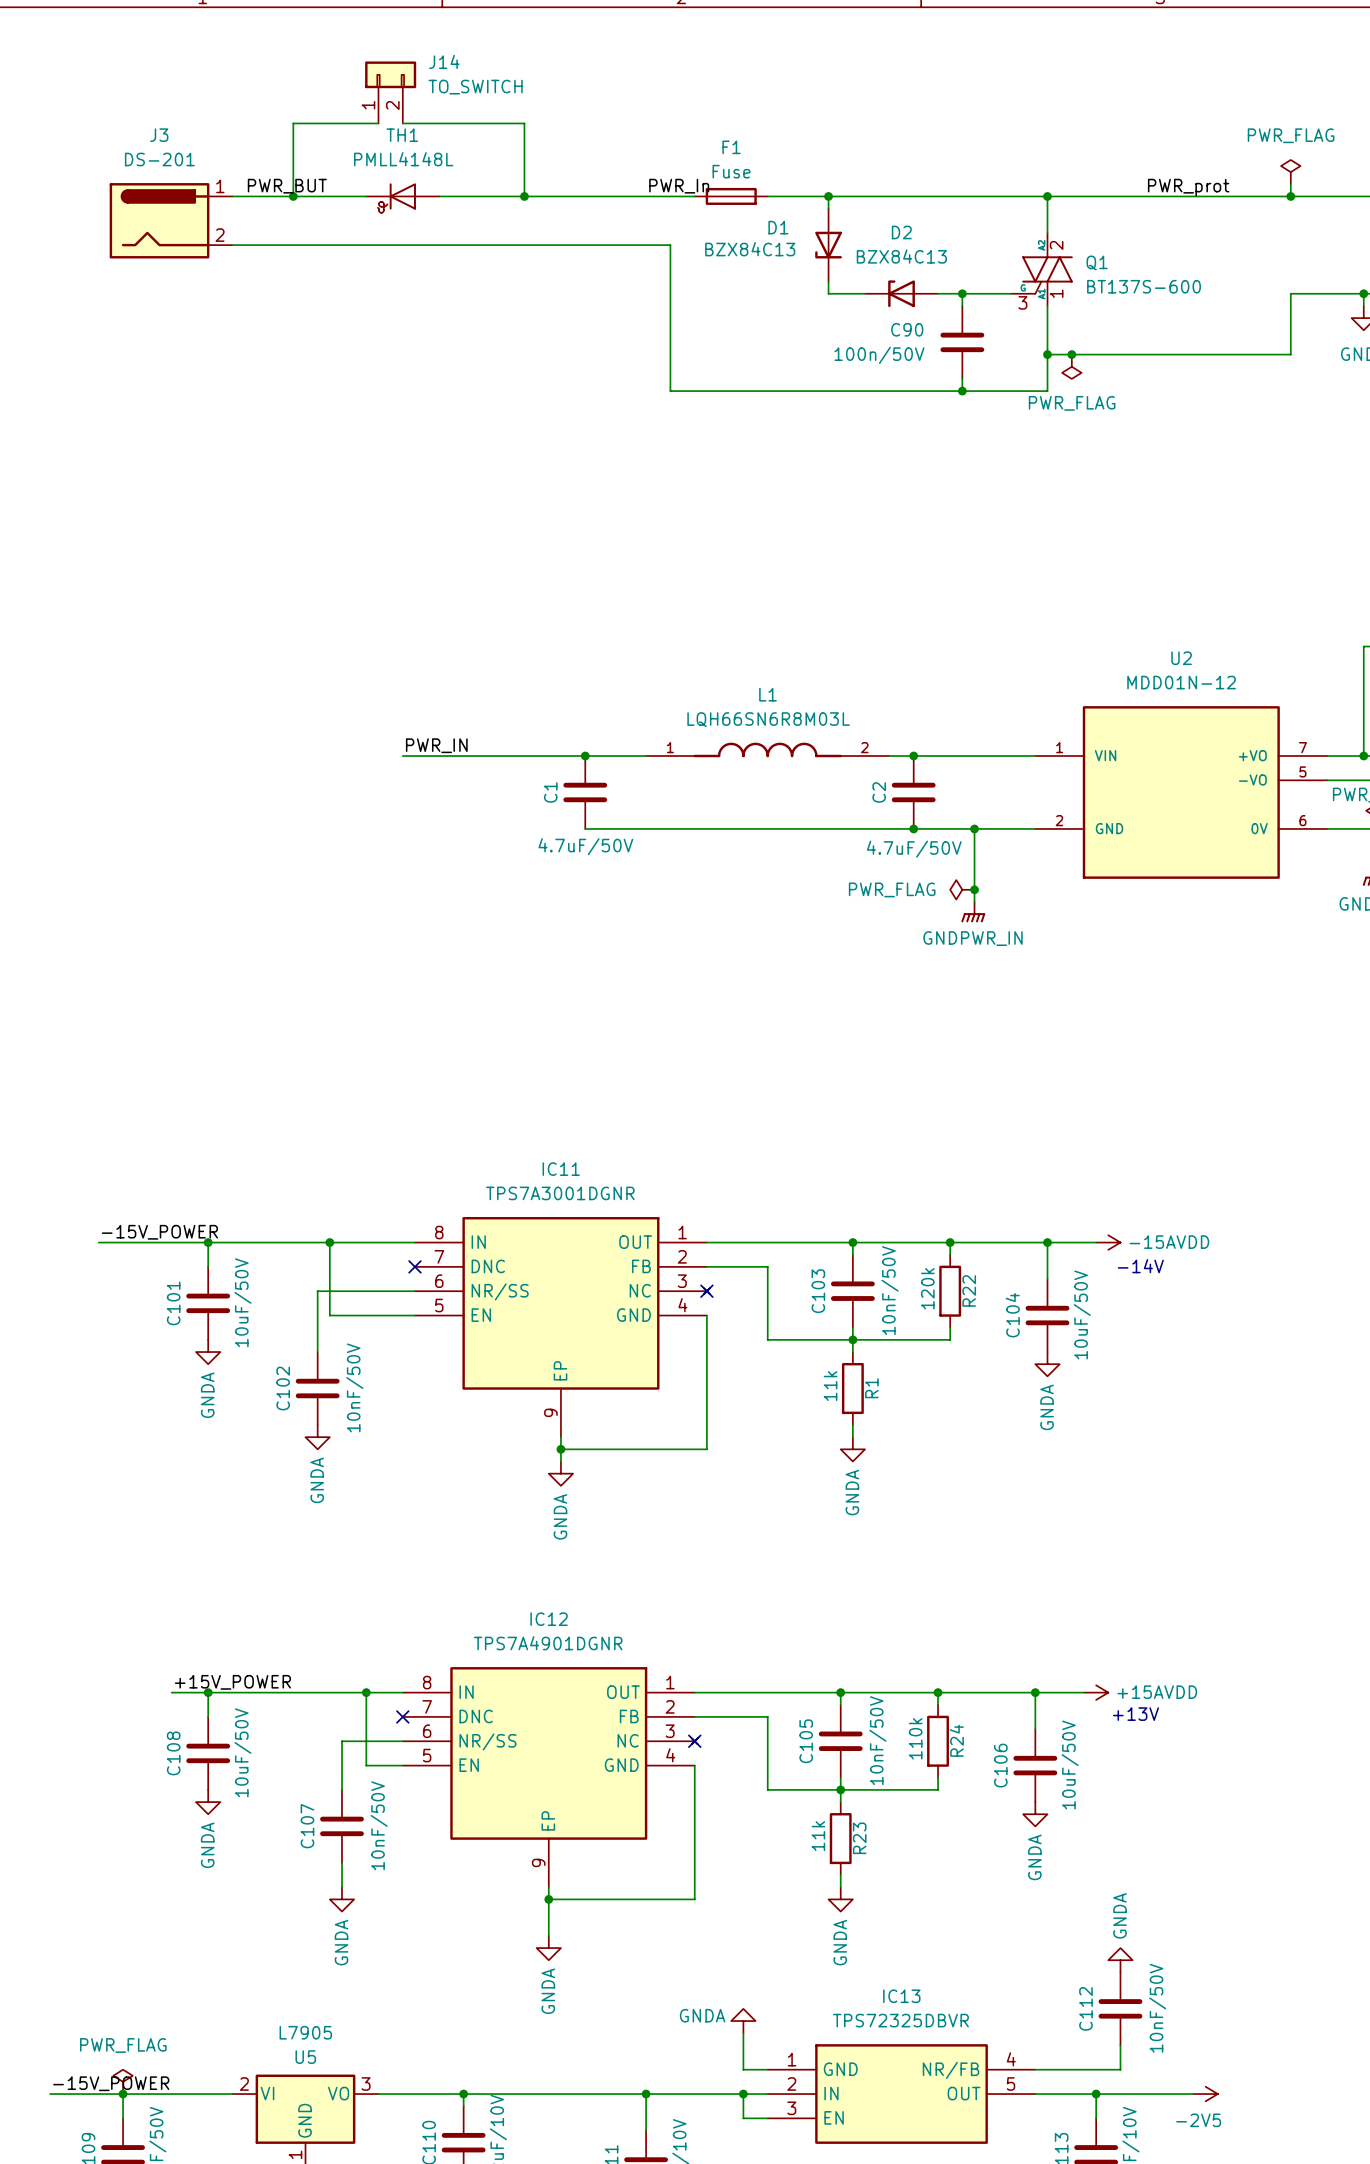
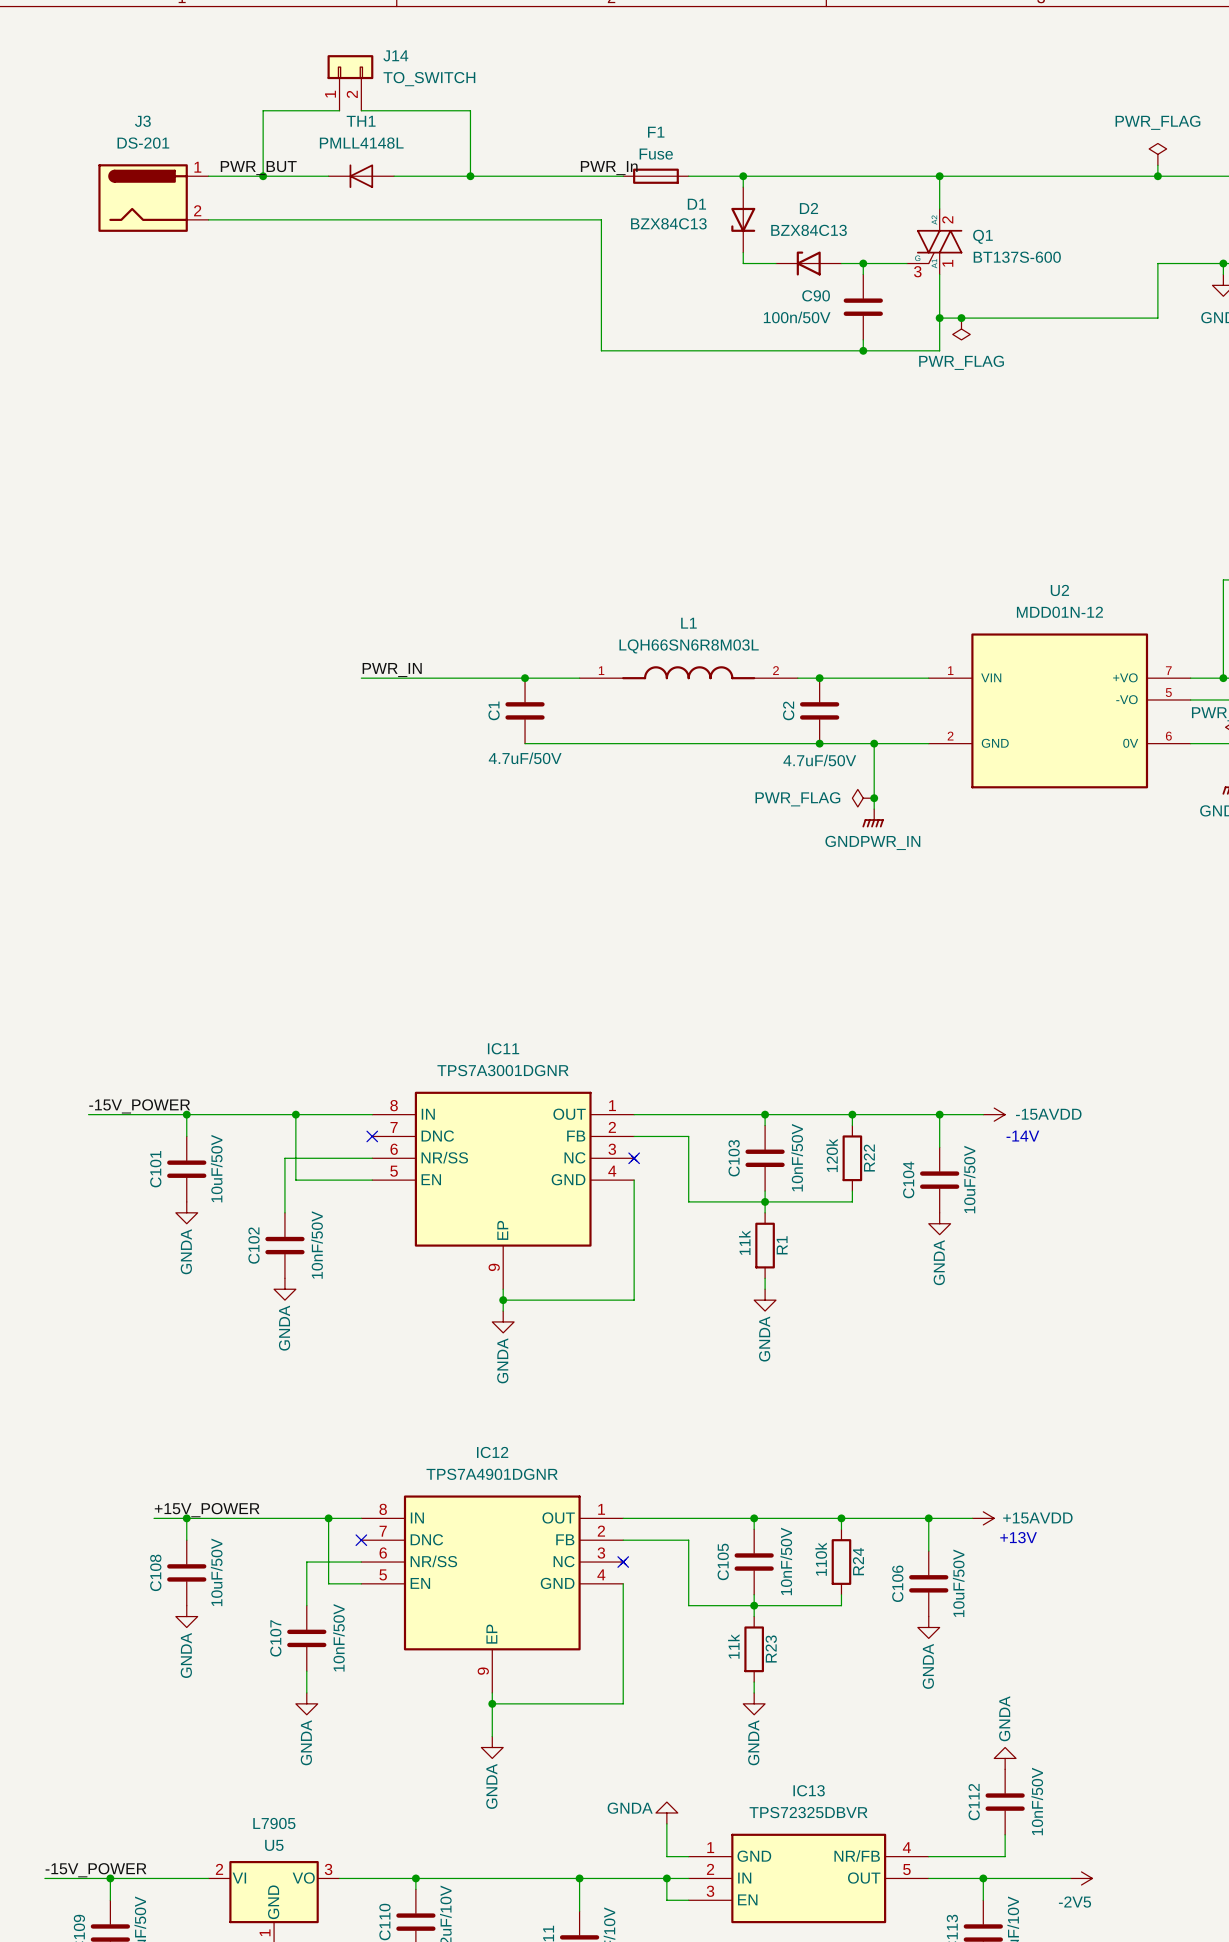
TH1 symbol: [366, 183, 440, 213] -> [328, 164, 395, 189]
label: PWR_prot (1188, 187) -> none
power symbol: PWR_FLAG (123, 2081) -> none

